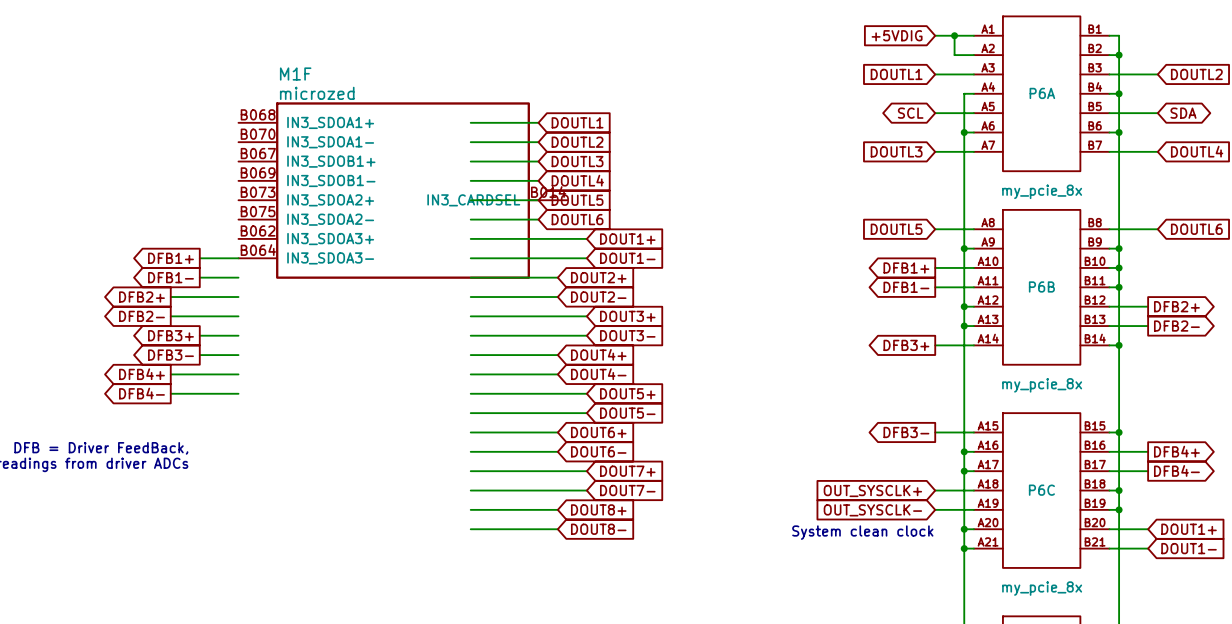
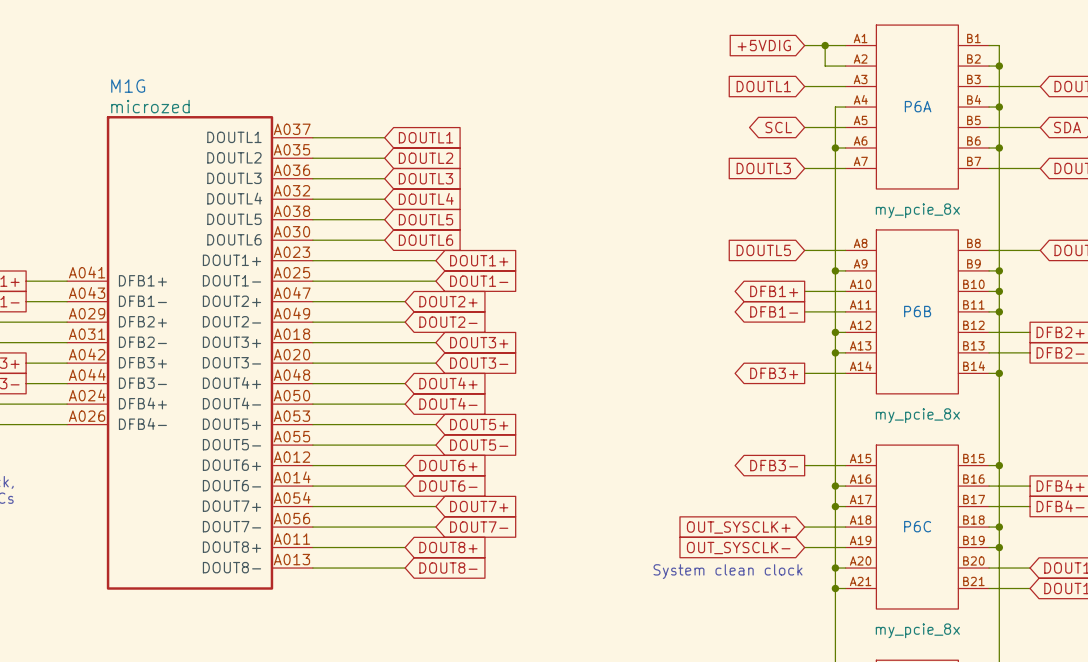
M1F: microzed (403, 190) -> none
M1G: none -> microzed (190, 352)

